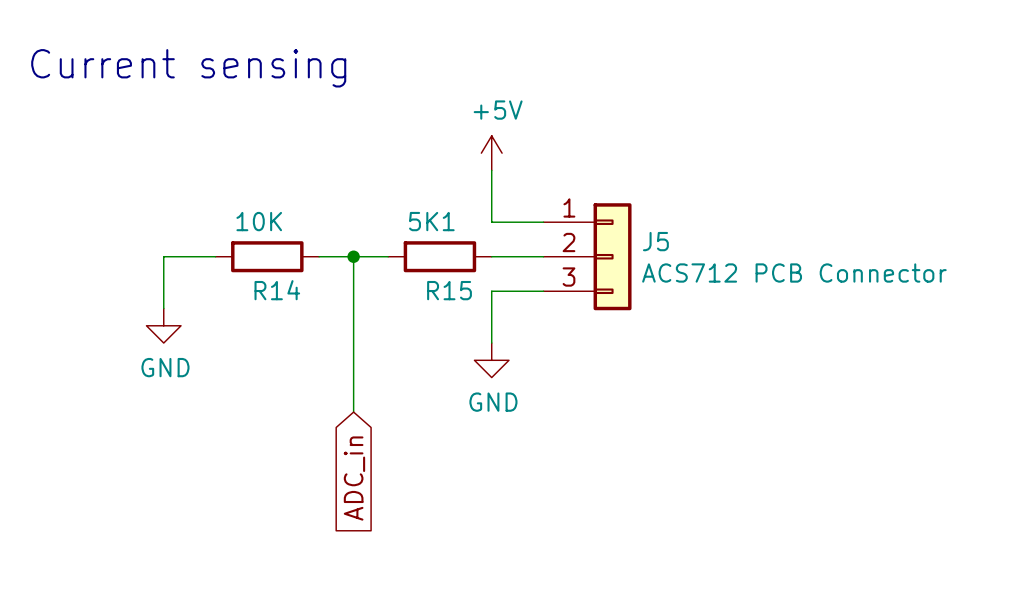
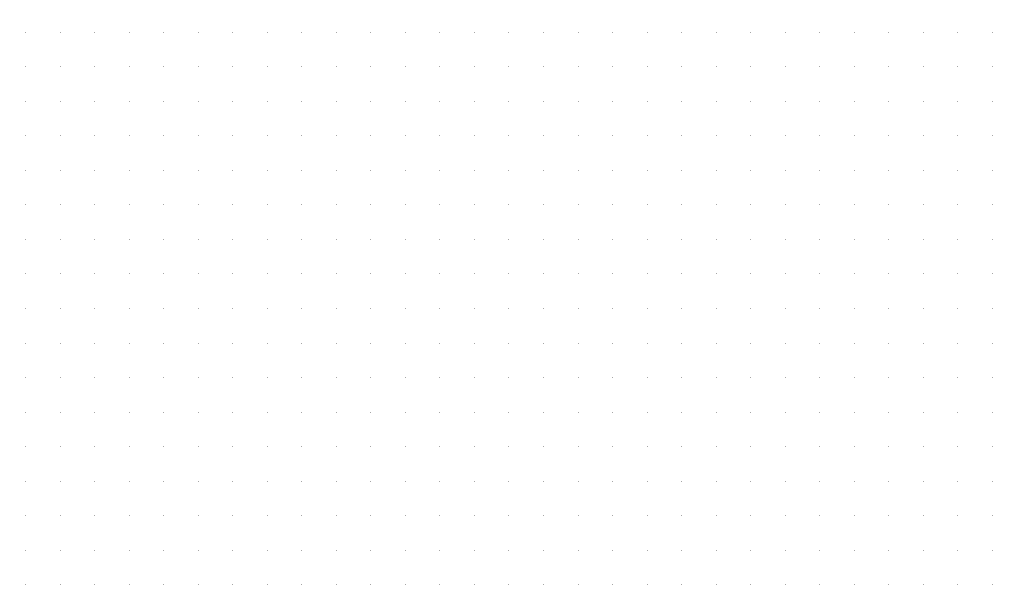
text: Current sensing (188, 68) -> none
power symbol: +5V (491, 153) -> none
wire: (491, 170) (491, 222) (543, 222) -> none
wire: (215, 256) (163, 256) (163, 308) -> none
R14: 10K (267, 256) -> none
wire: (319, 256) (388, 256) -> none
wire: (353, 256) (353, 412) -> none
junction: (353, 256) -> none
R15: 5K1 (439, 256) -> none
wire: (491, 256) (543, 256) -> none
J5: ACS712 PCB Connector (587, 256) -> none
wire: (543, 291) (491, 291) (491, 343) -> none
power symbol: GND (163, 325) -> none
power symbol: GND (491, 360) -> none
global label: ADC_in (354, 478) -> none

